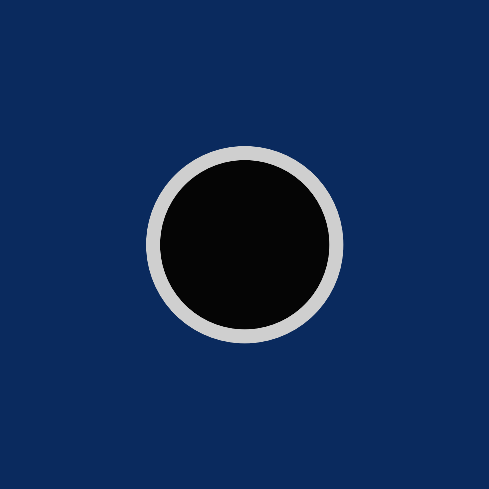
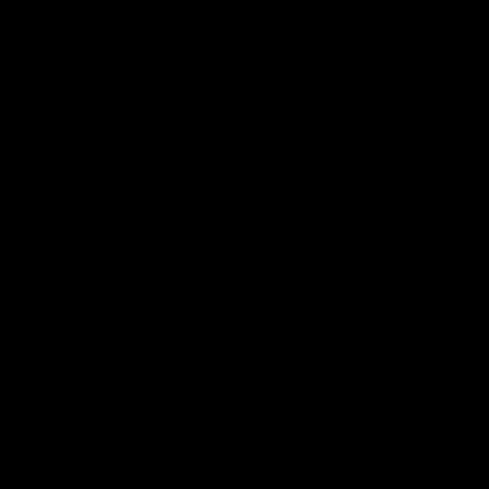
part: (244, 244) -> none

